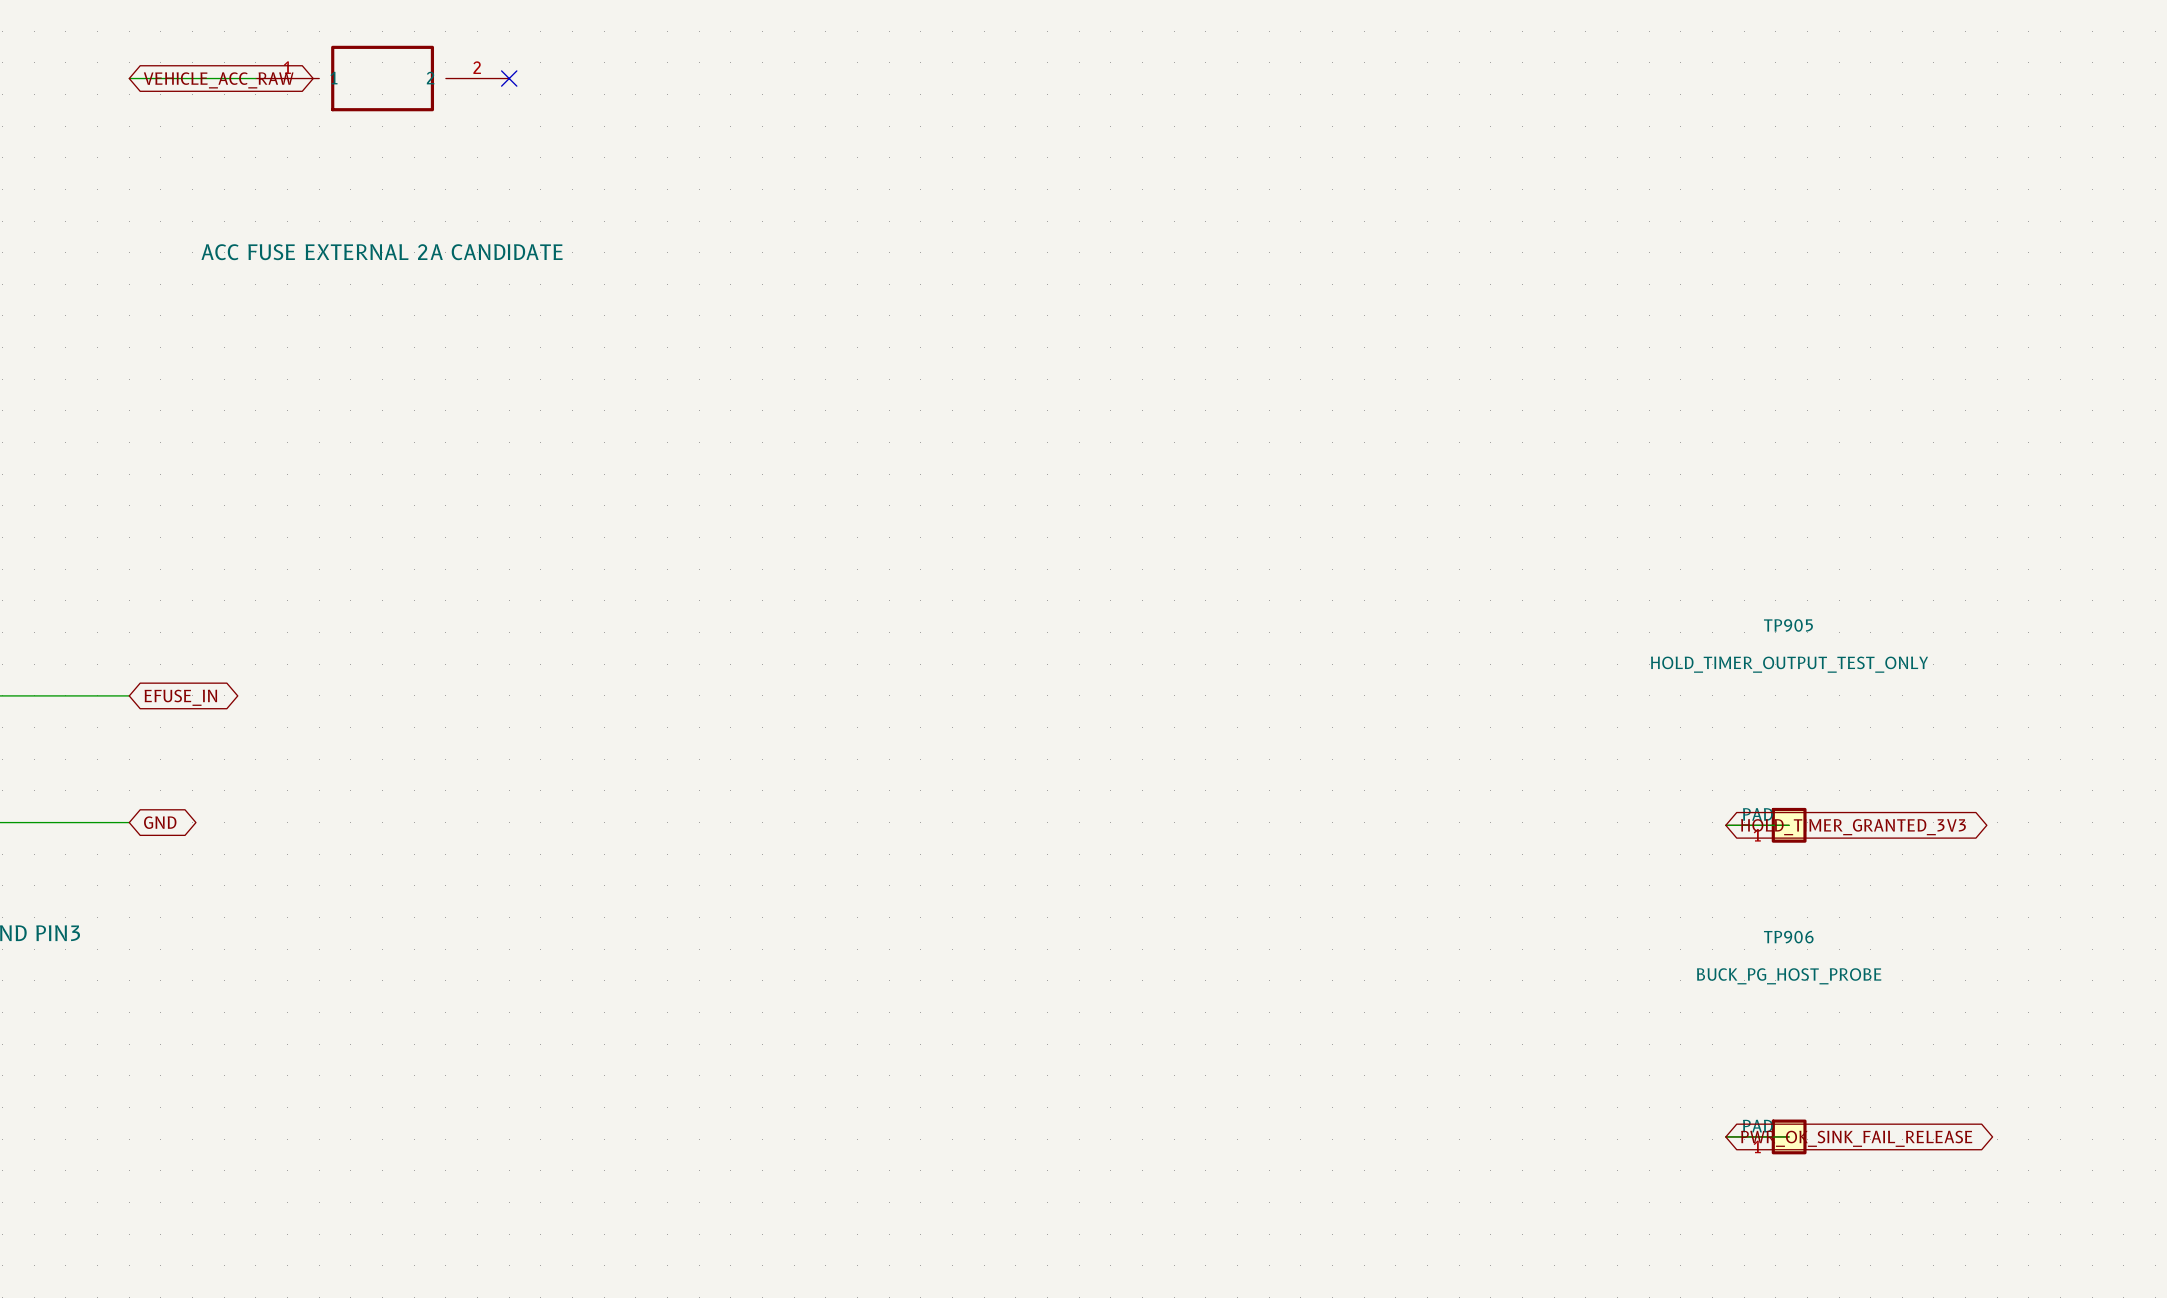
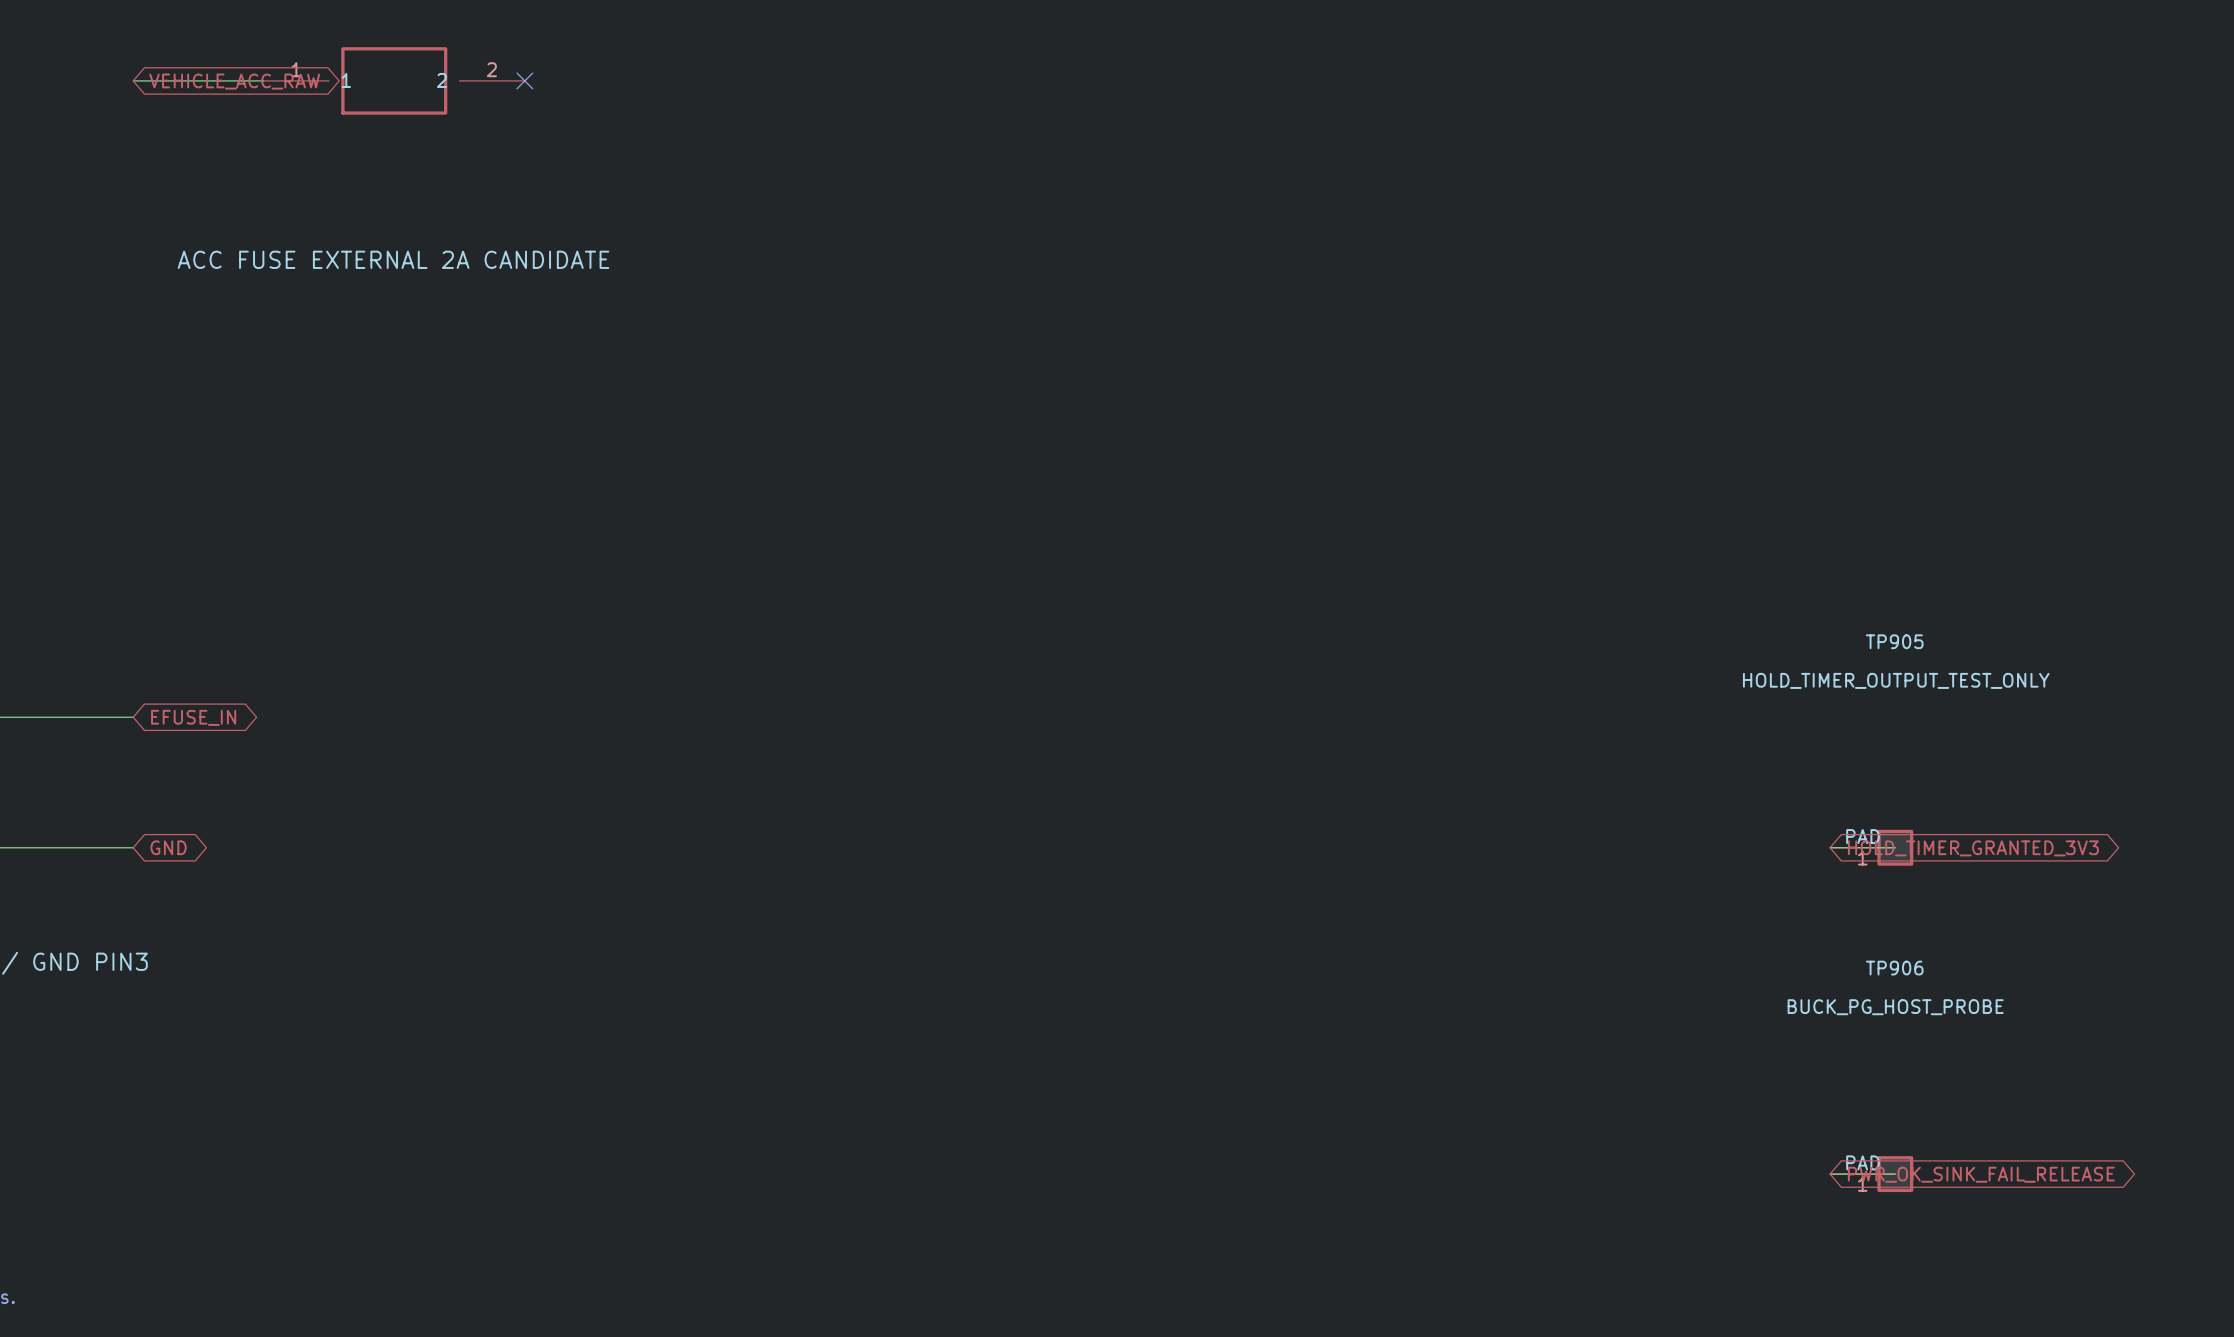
TP905 position: (1766, 825) -> (1871, 847)
global label position: HOLD_TIMER_GRANTED_3V3 (1853, 827) -> HOLD_TIMER_GRANTED_3V3 (1973, 848)
TP906 position: (1766, 1136) -> (1871, 1174)
global label position: PWR_OK_SINK_FAIL_RELEASE (1856, 1138) -> PWR_OK_SINK_FAIL_RELEASE (1981, 1174)

